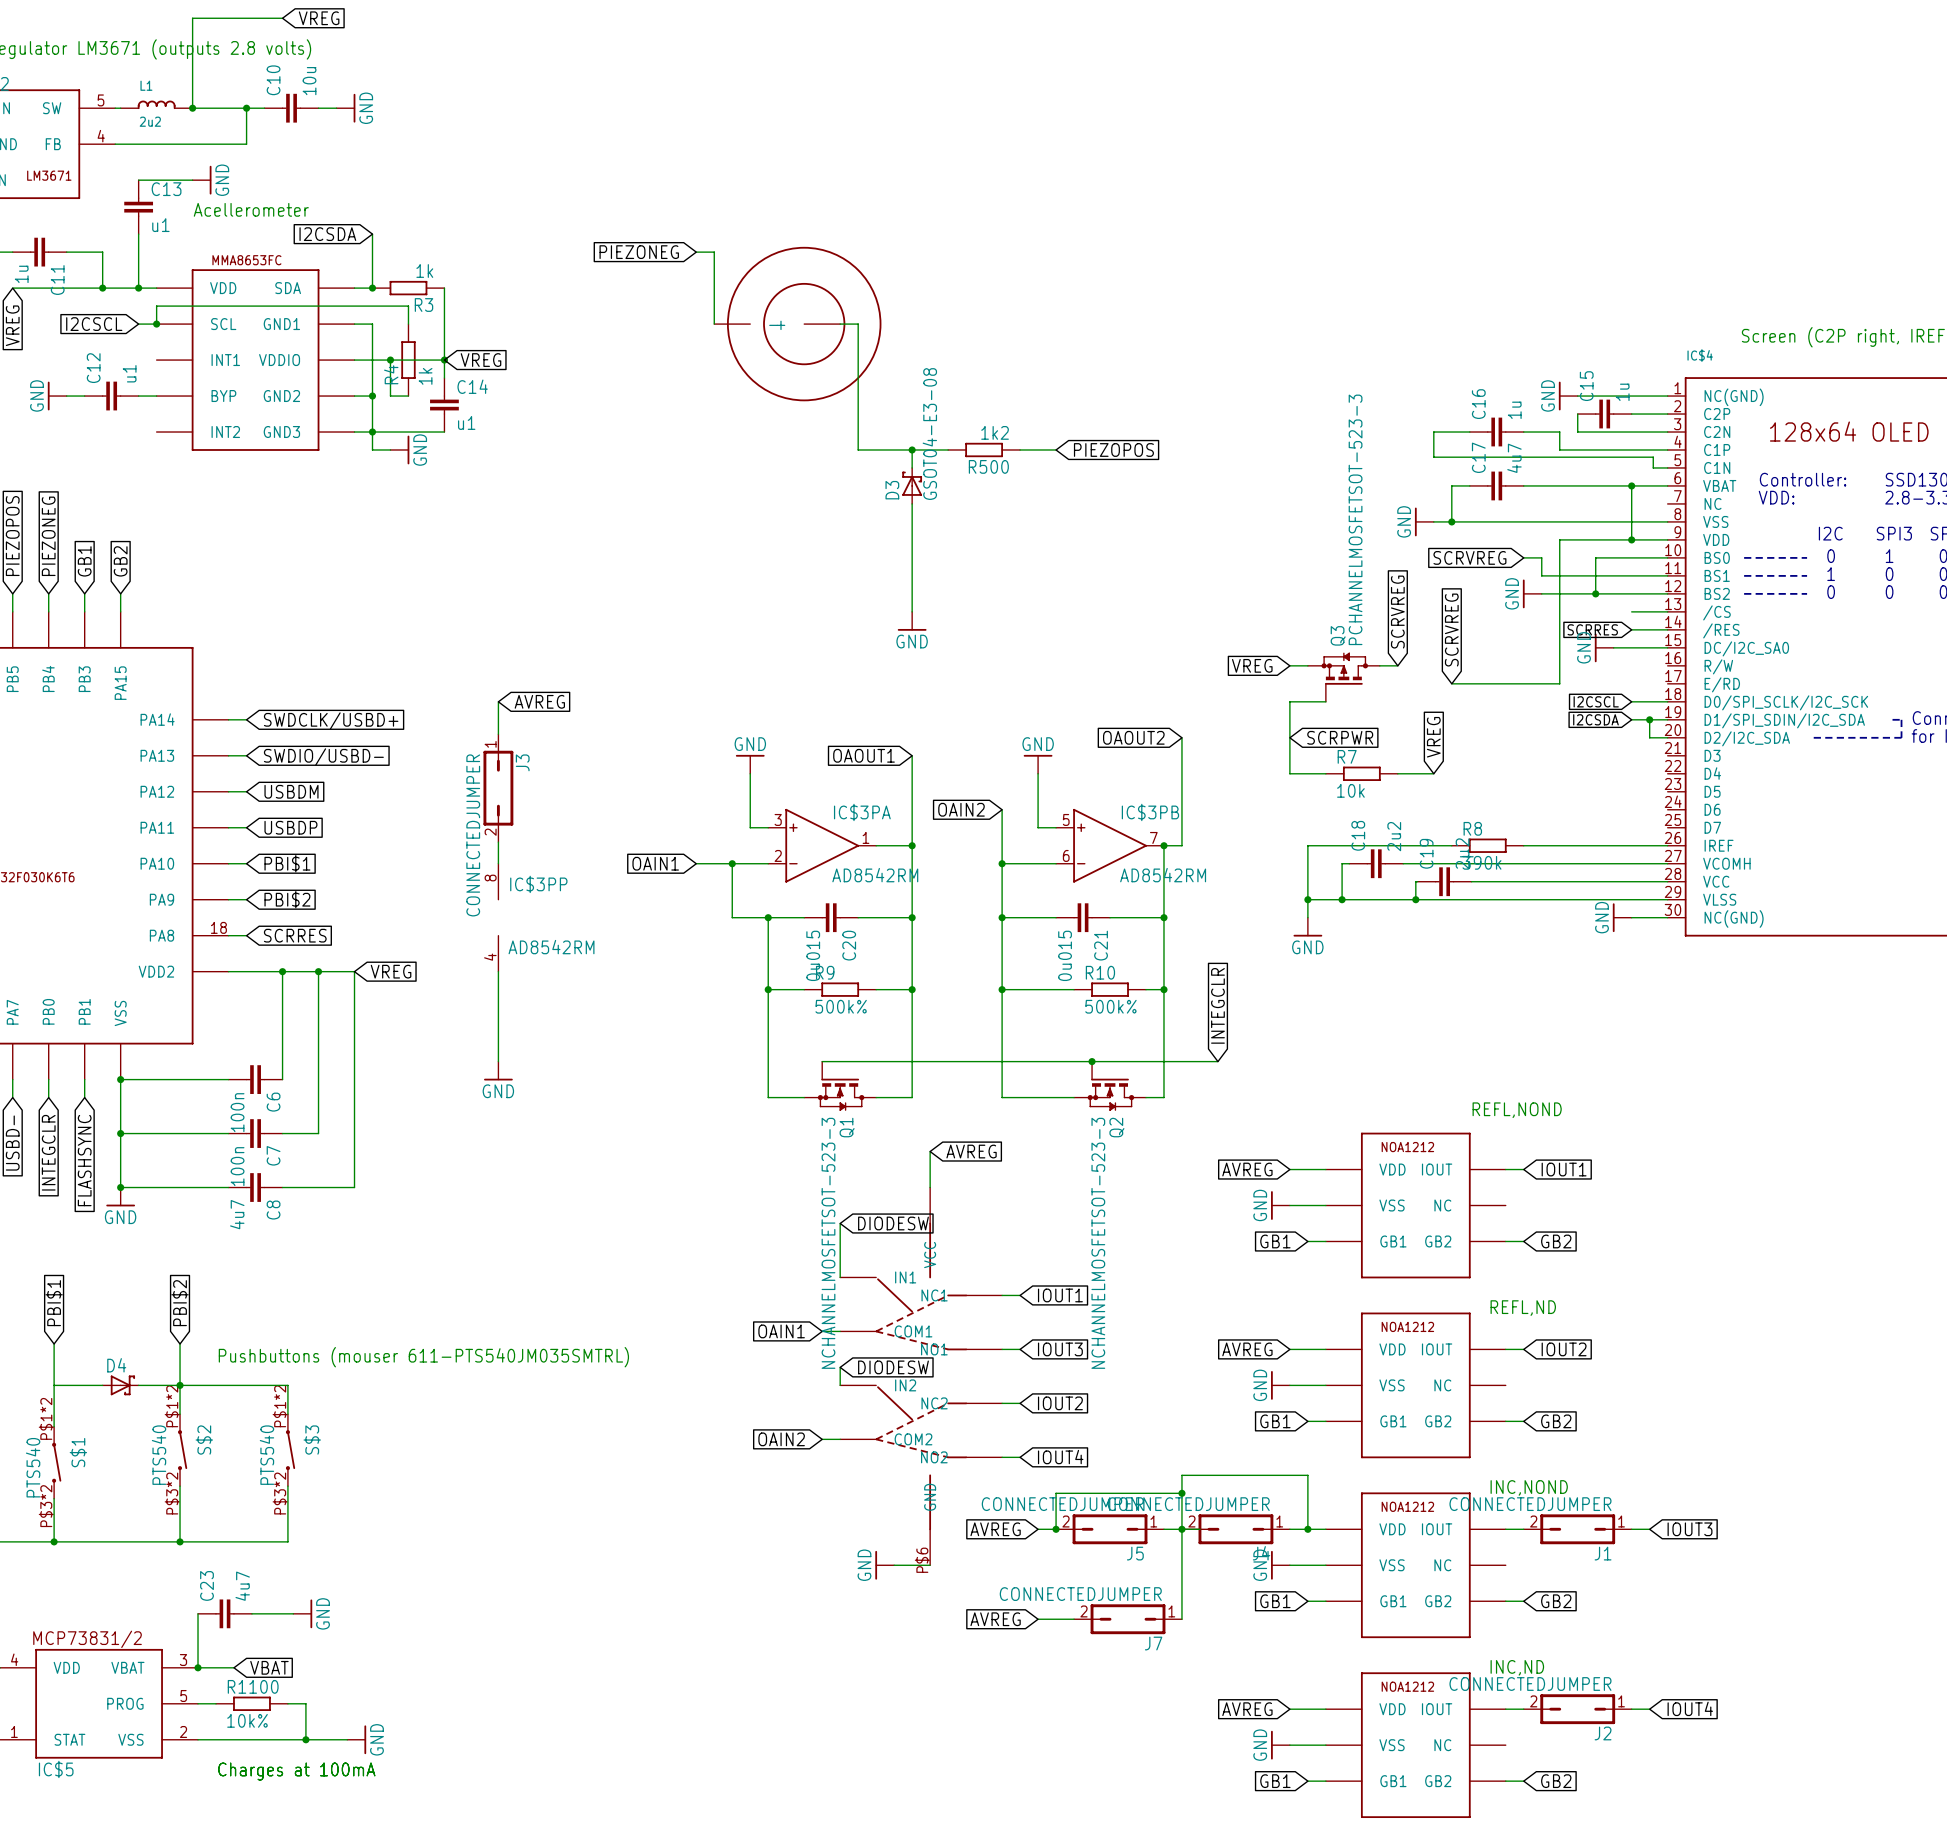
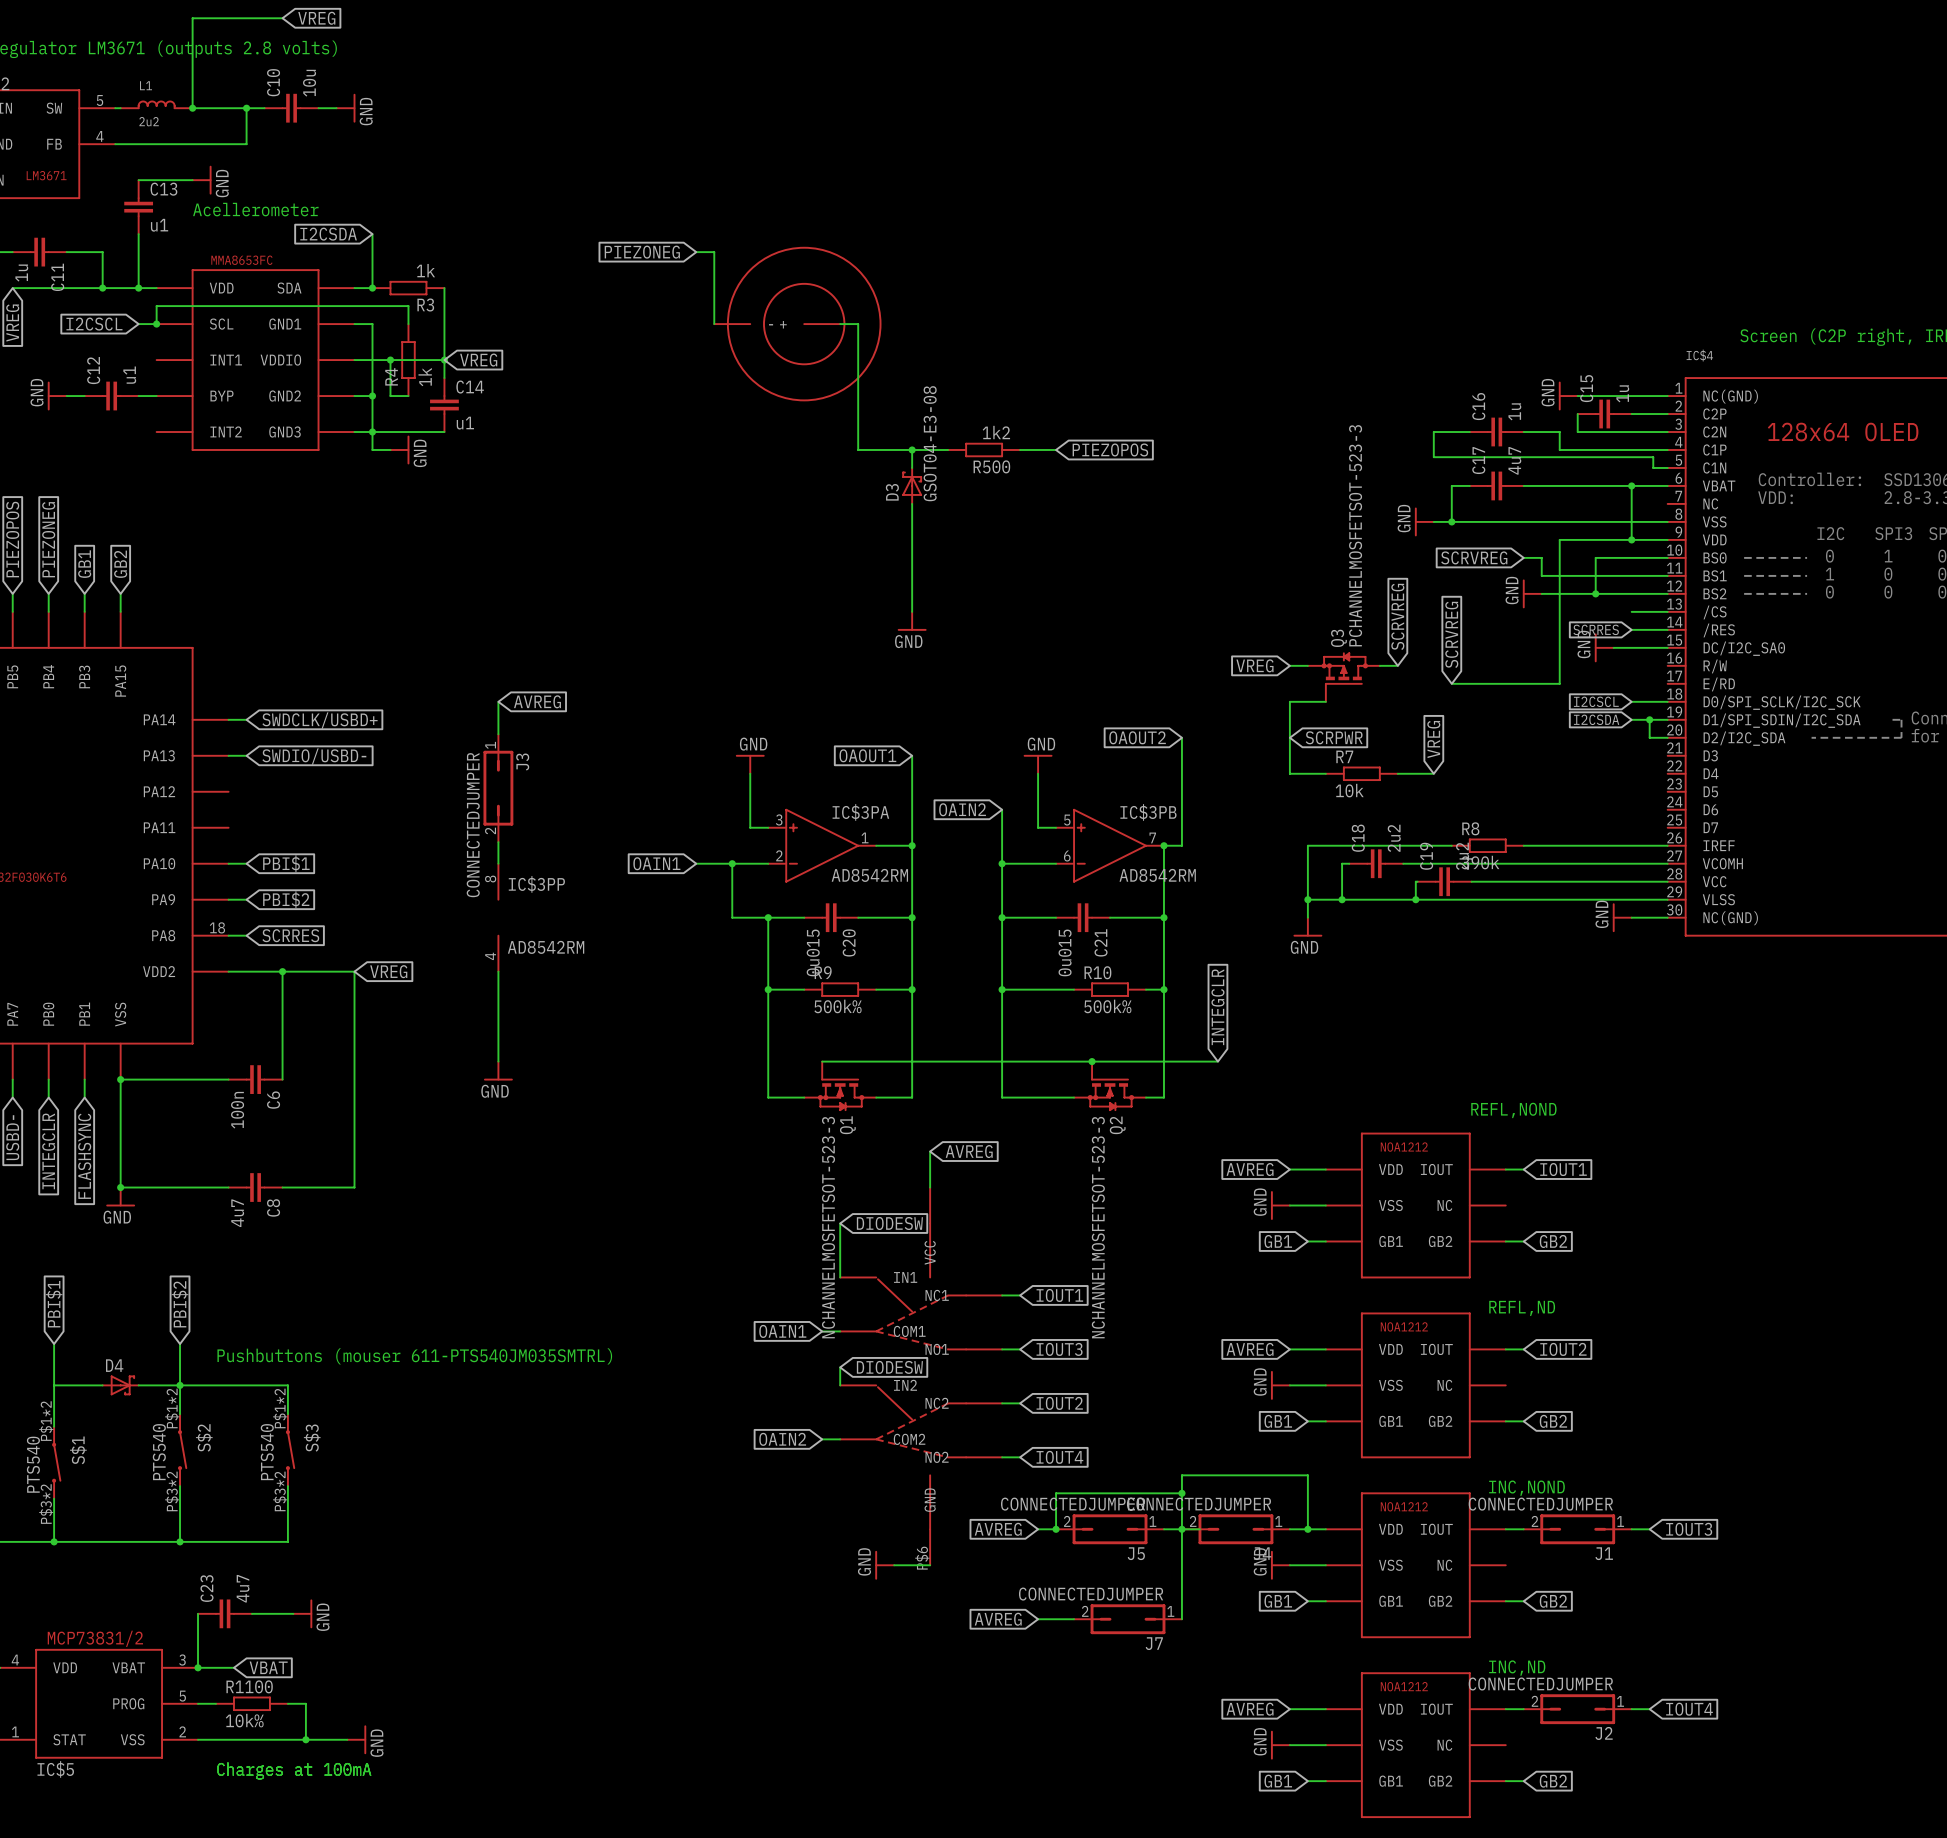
wire: (228, 791) (246, 791) -> none
global label: USBDM (291, 791) -> none
wire: (228, 827) (246, 827) -> none
global label: USBDP (290, 827) -> none
wire: (318, 971) (318, 1133) (282, 1133) -> none
junction: (318, 971) -> none
wire: (120, 1133) (228, 1133) -> none
junction: (120, 1133) -> none
C7: 100n (255, 1133) -> none

